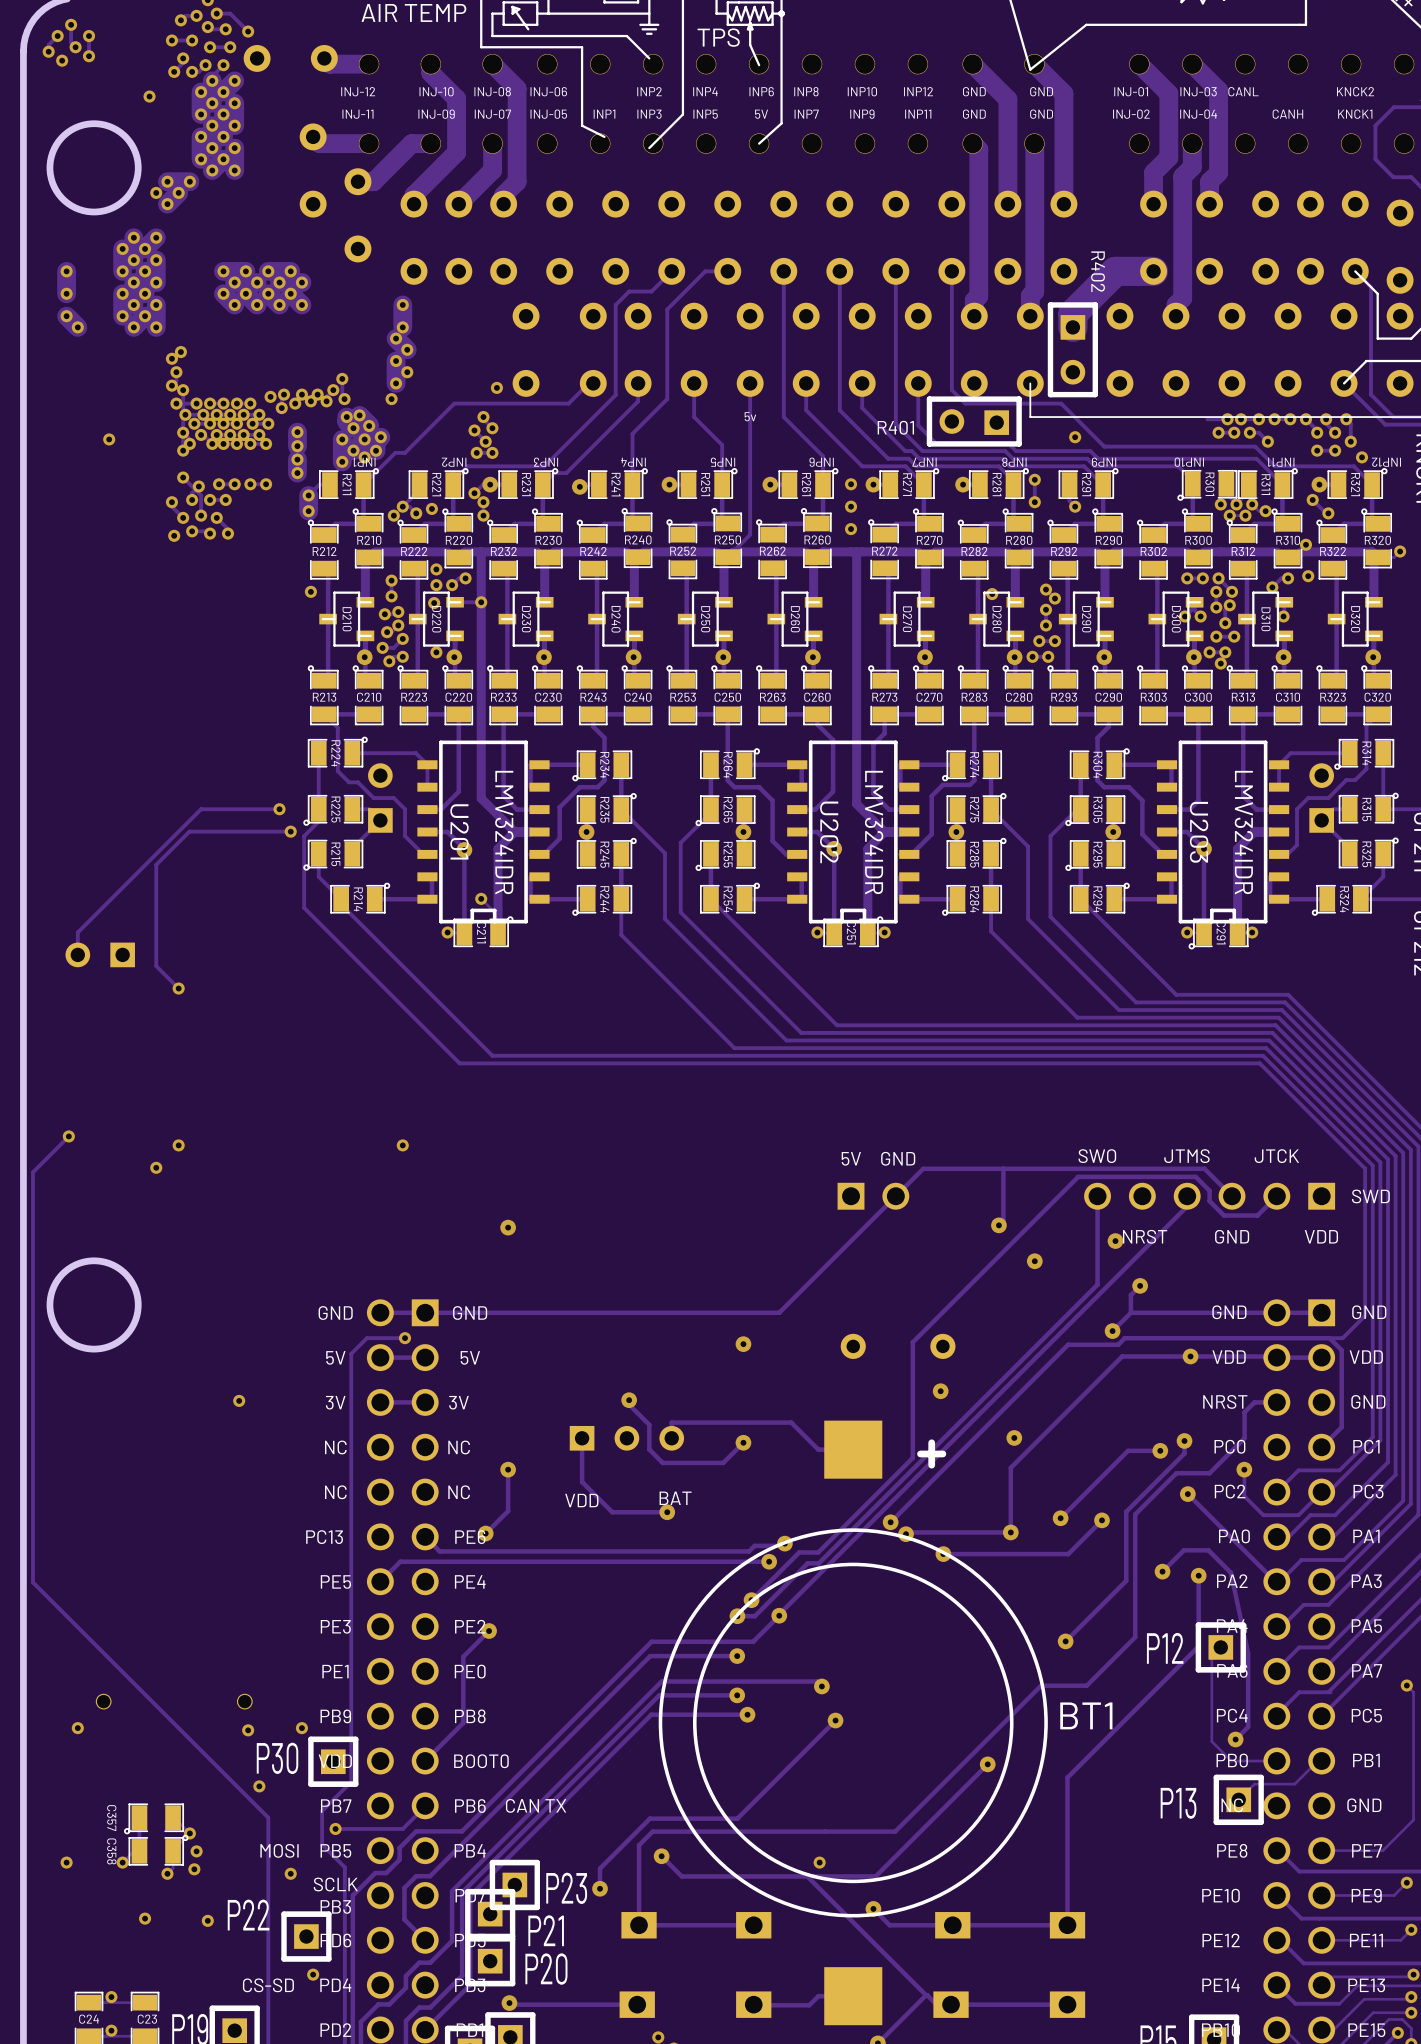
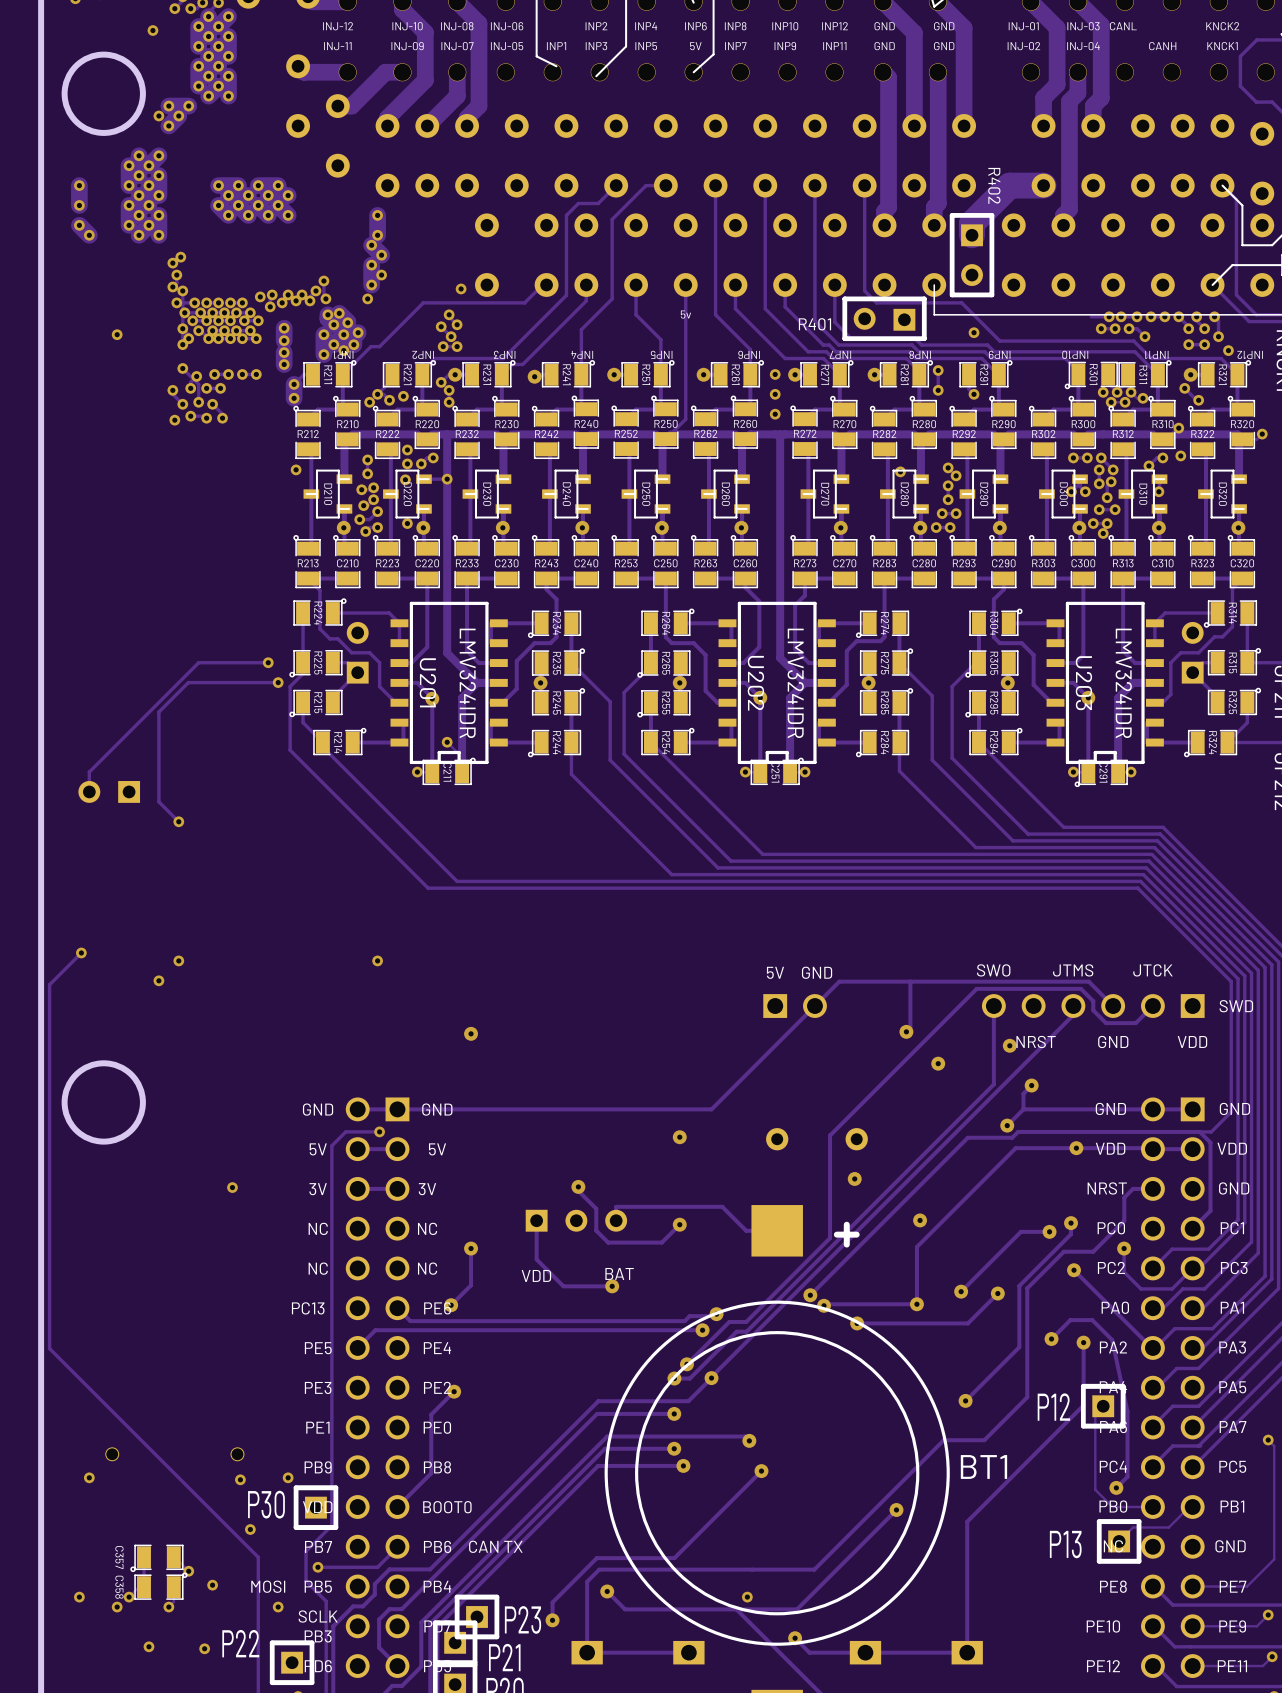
via: none -> (212, 1585)
via: (196, 1851) -> none
via: (194, 1869) -> none
via: none -> (117, 1607)

